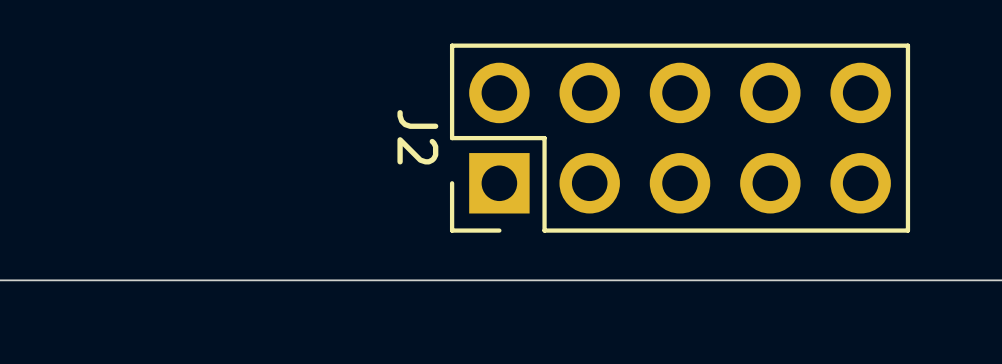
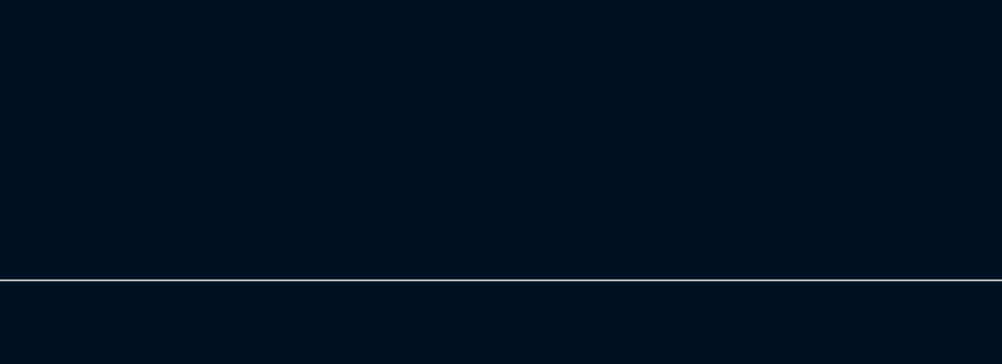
J2: (680, 138) -> none

